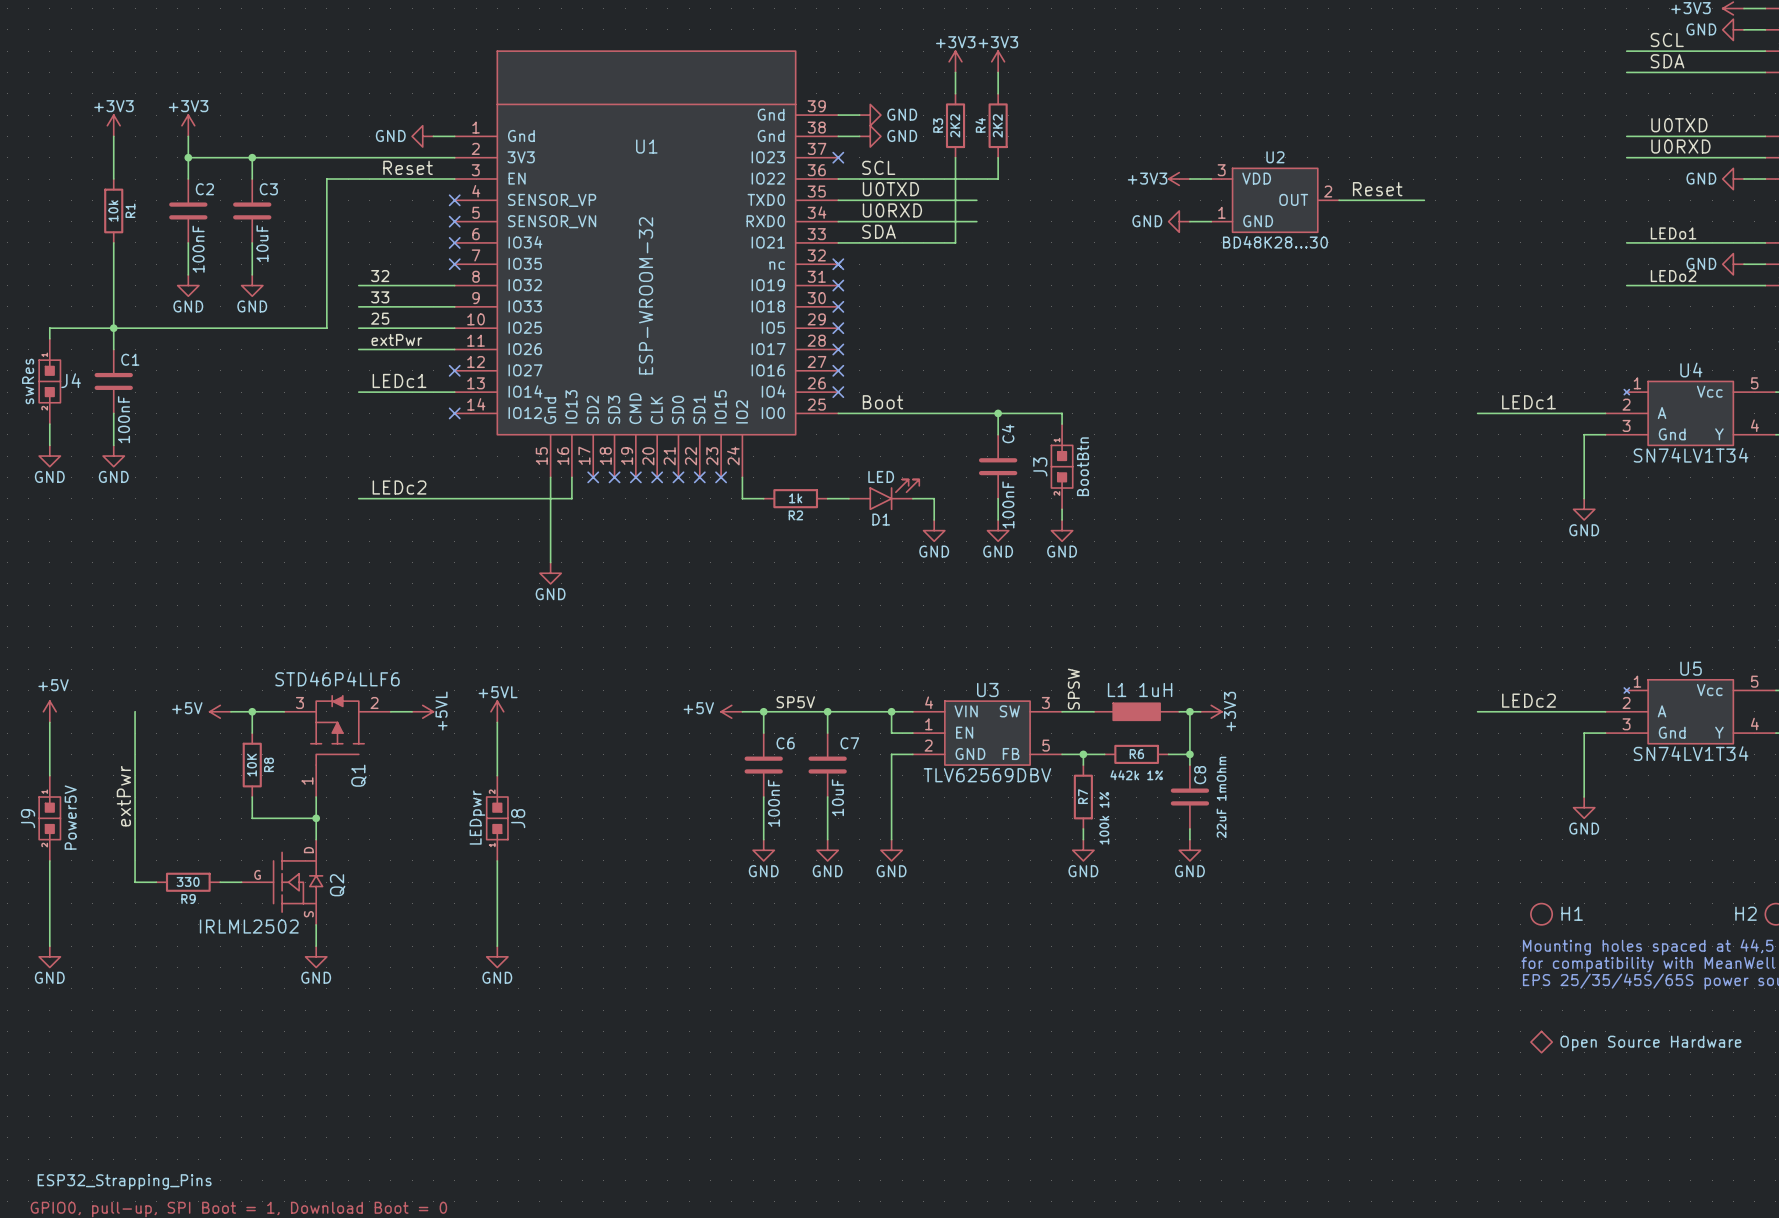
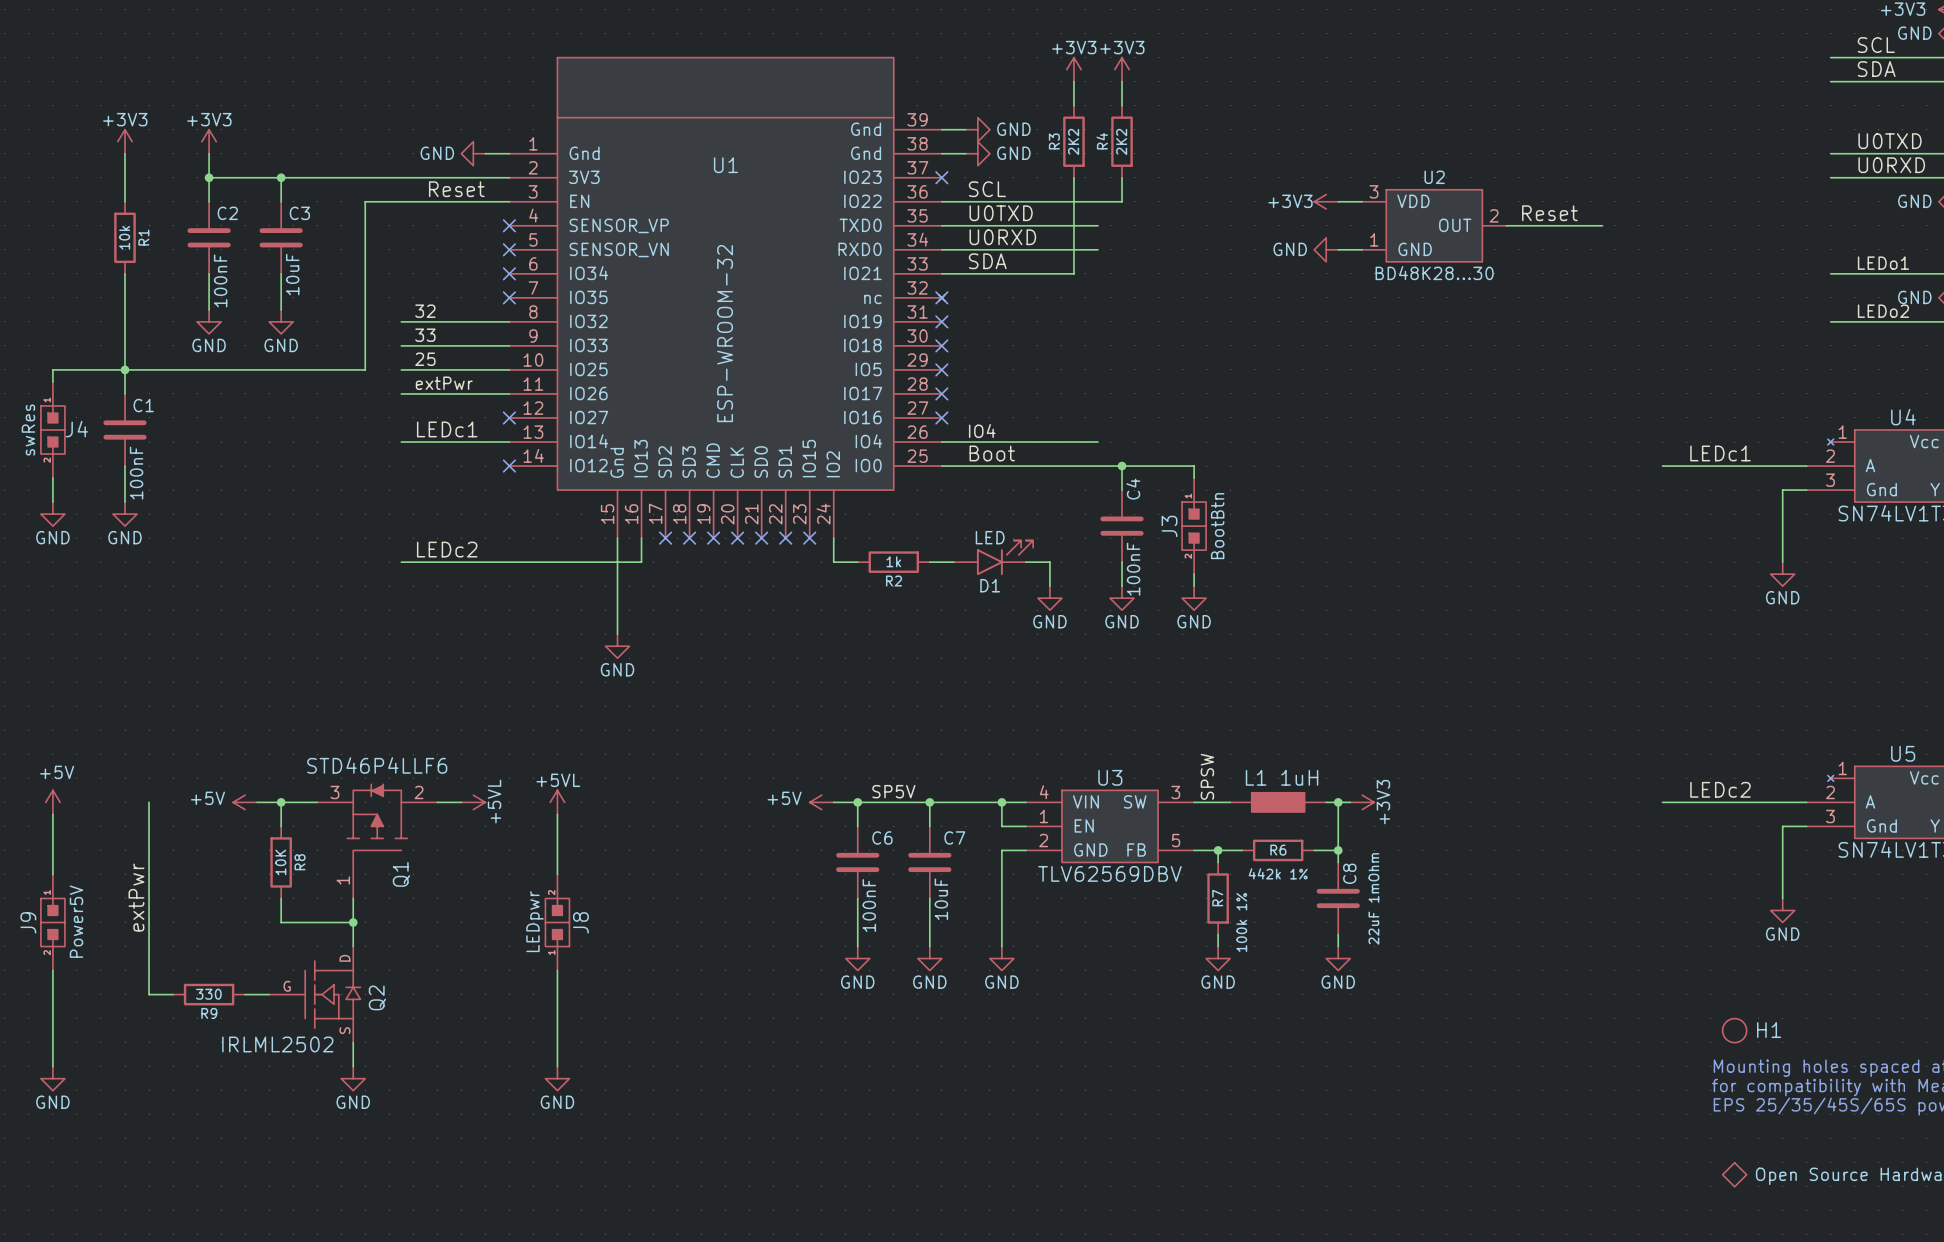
label: none -> IO4 (982, 431)
wire: none -> (941, 442) (1097, 442)
no-connect mark: (838, 392) -> none

